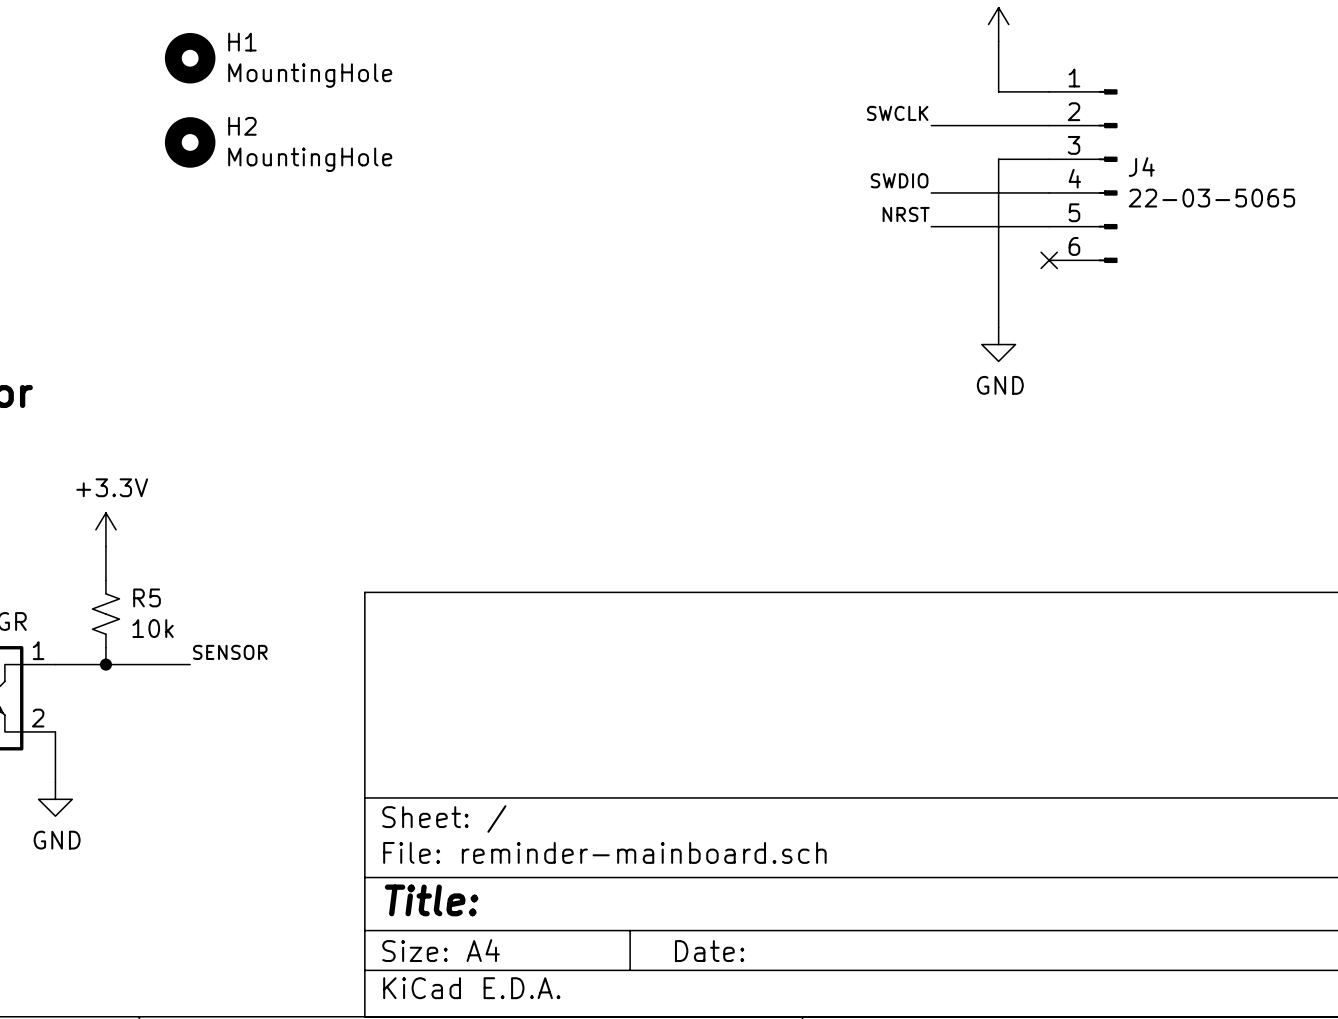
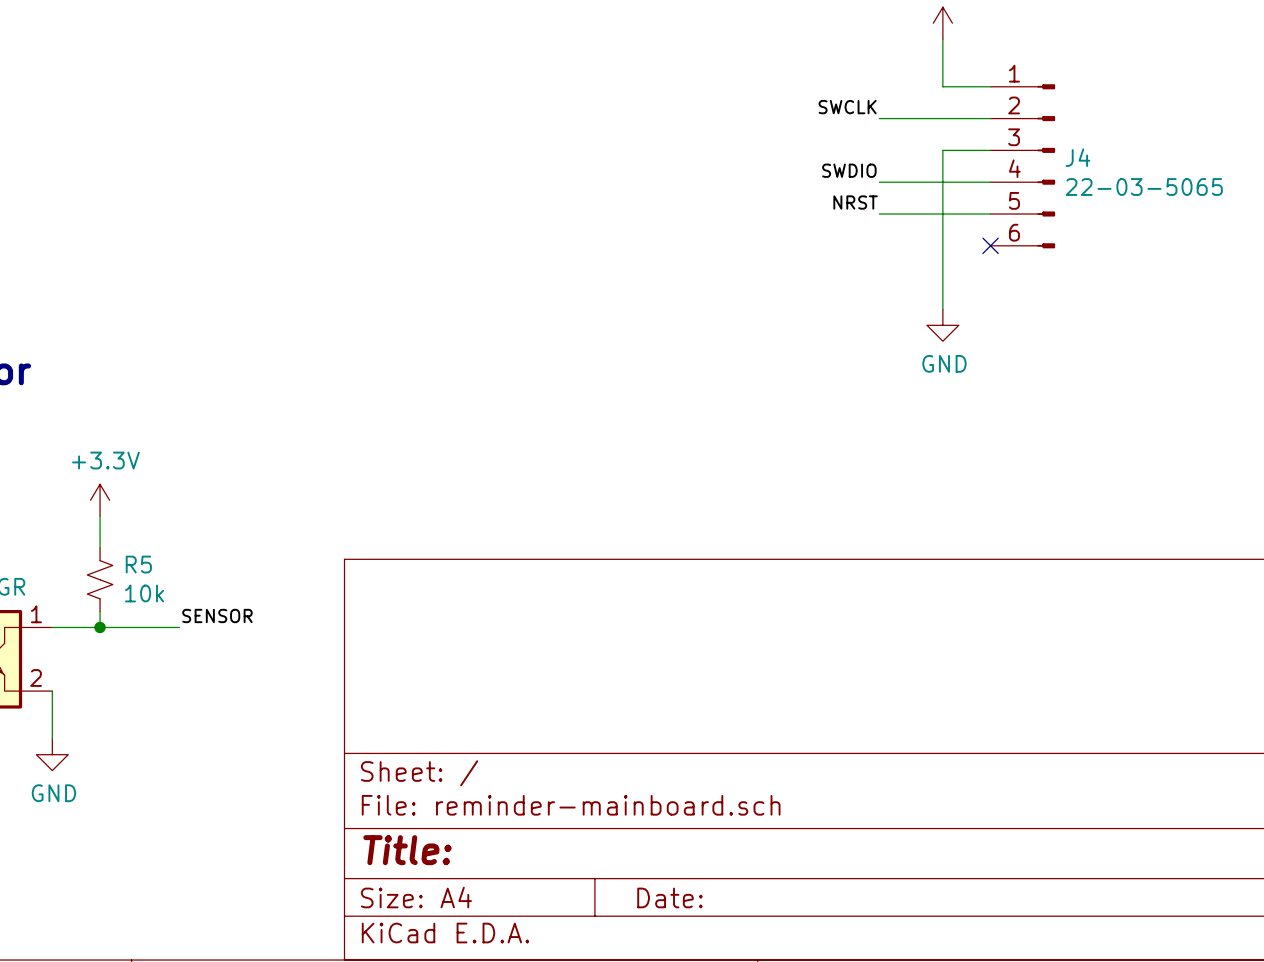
H1: MountingHole (190, 58) -> none
H2: MountingHole (190, 142) -> none

